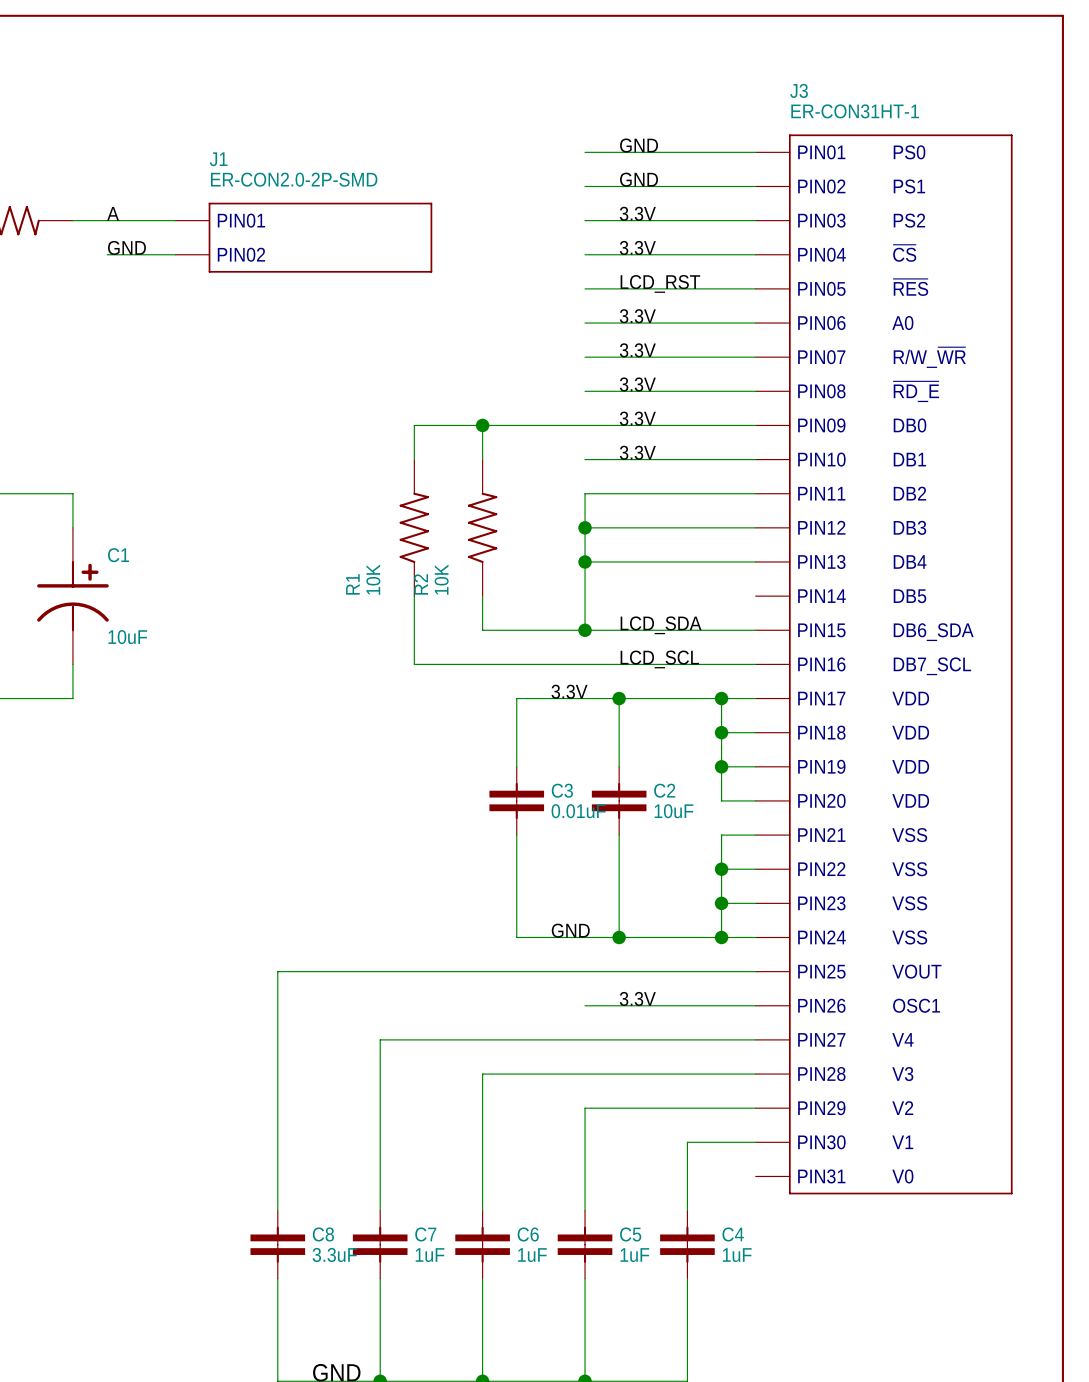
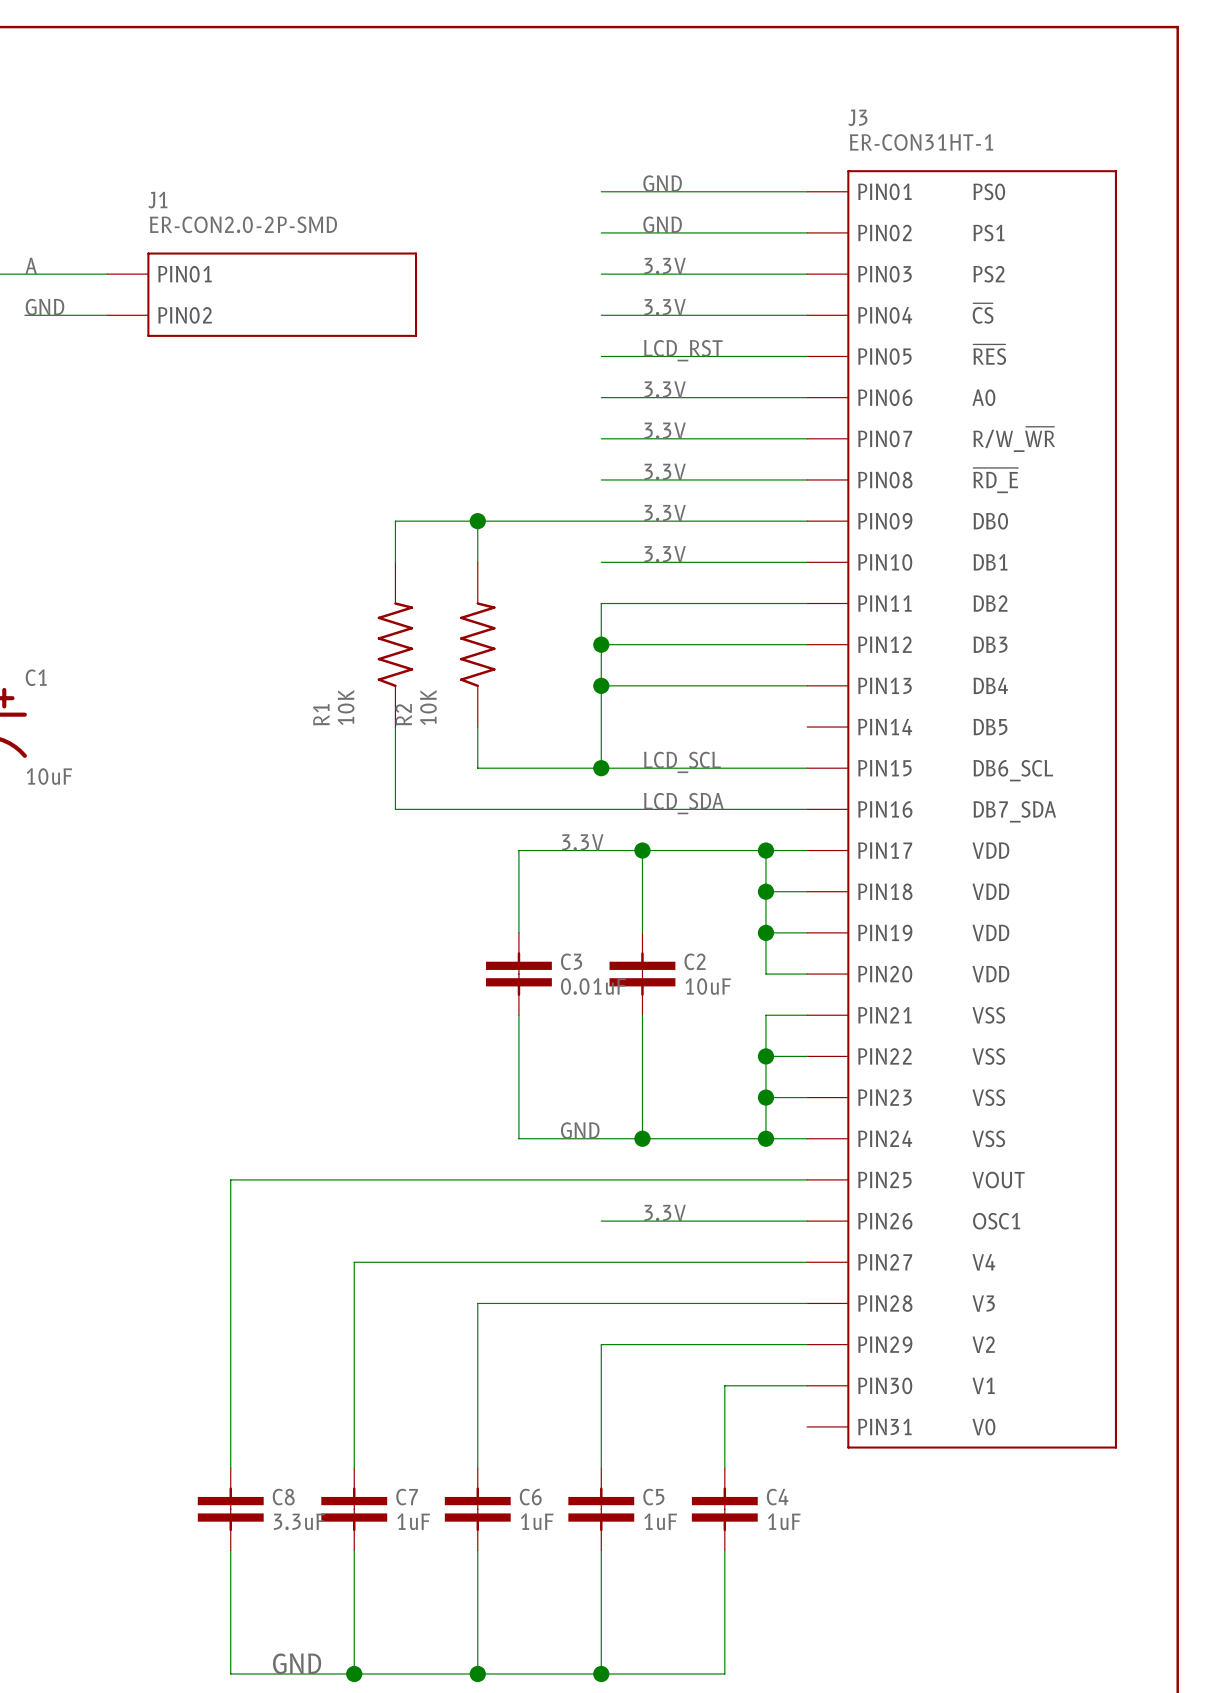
label: LCD_SDA (661, 625) -> LCD_SCL (682, 762)
J3 text: DB6_SDA (933, 632) -> DB6_SCL (1013, 770)
label: LCD_SCL (659, 659) -> LCD_SDA (683, 803)
J3 text: DB7_SCL (932, 666) -> DB7_SDA (1014, 811)

